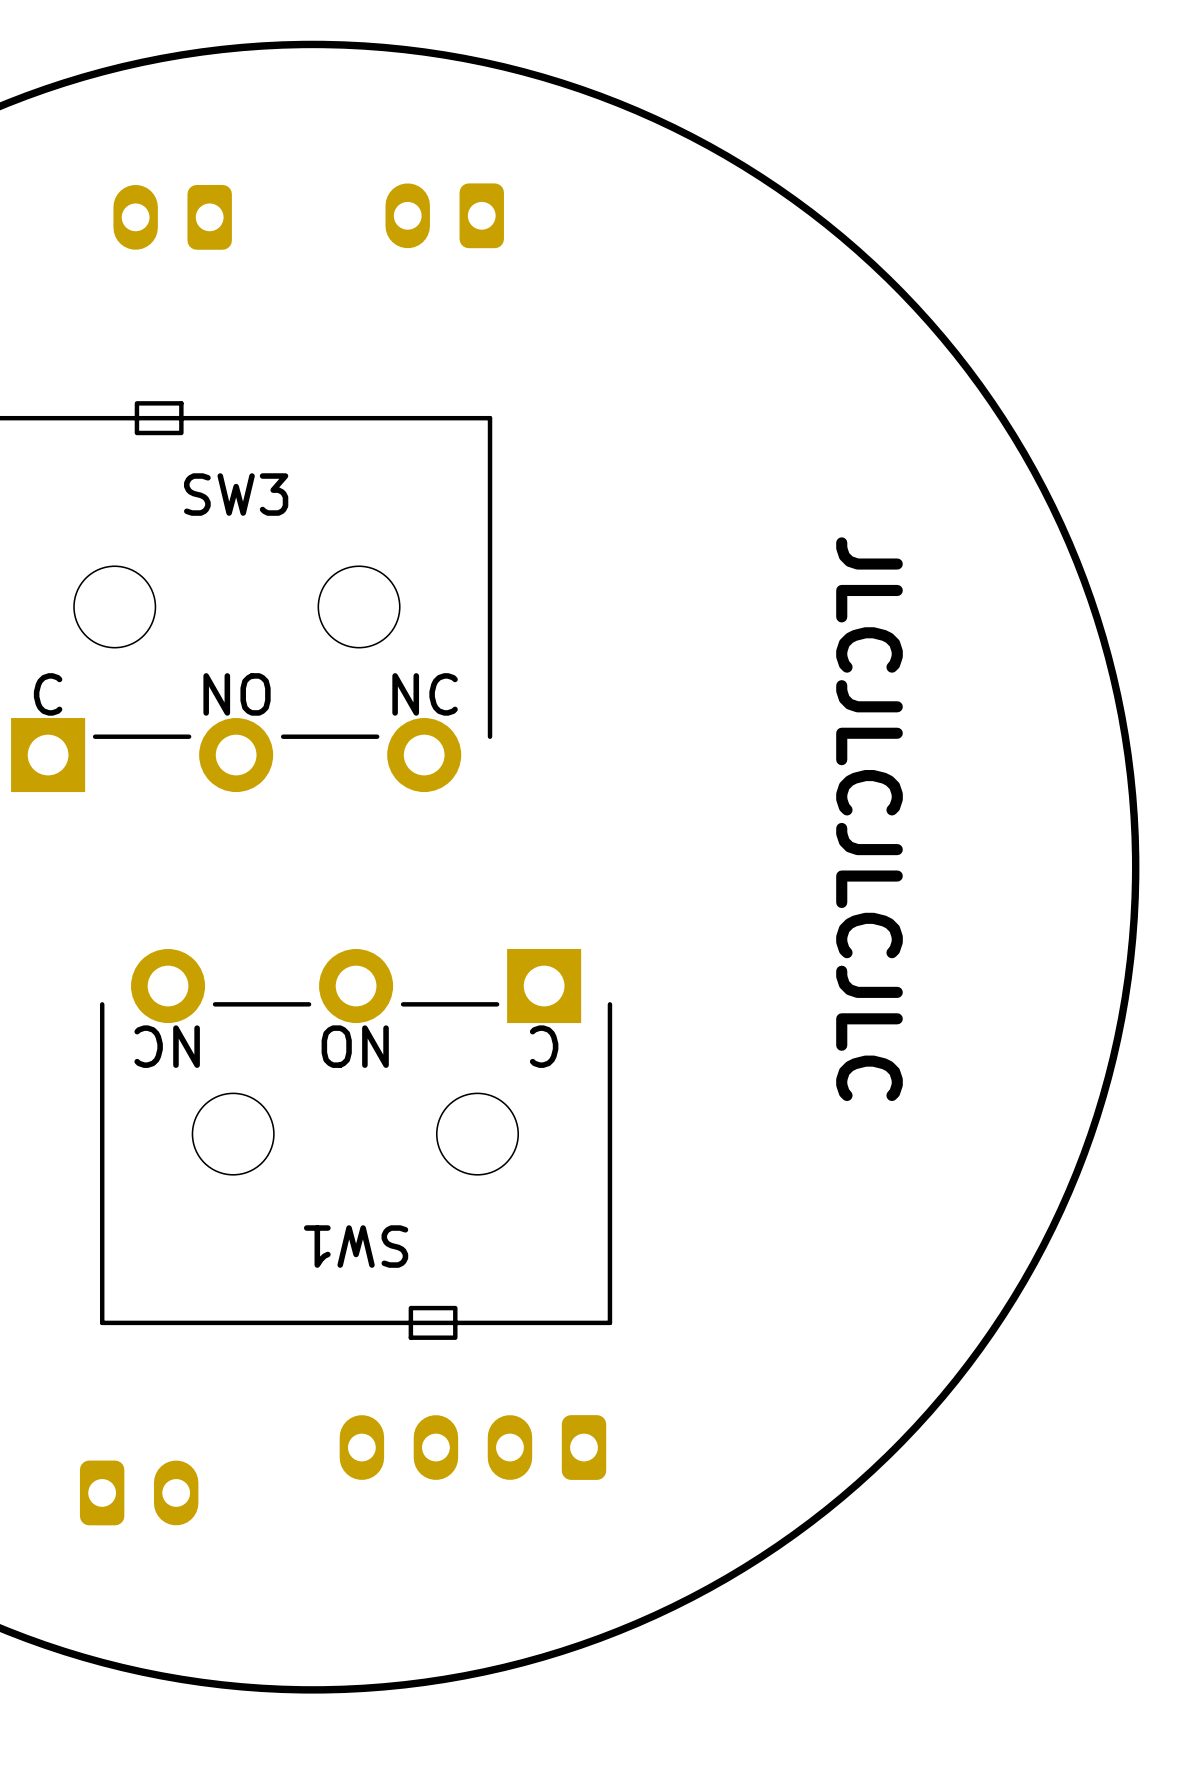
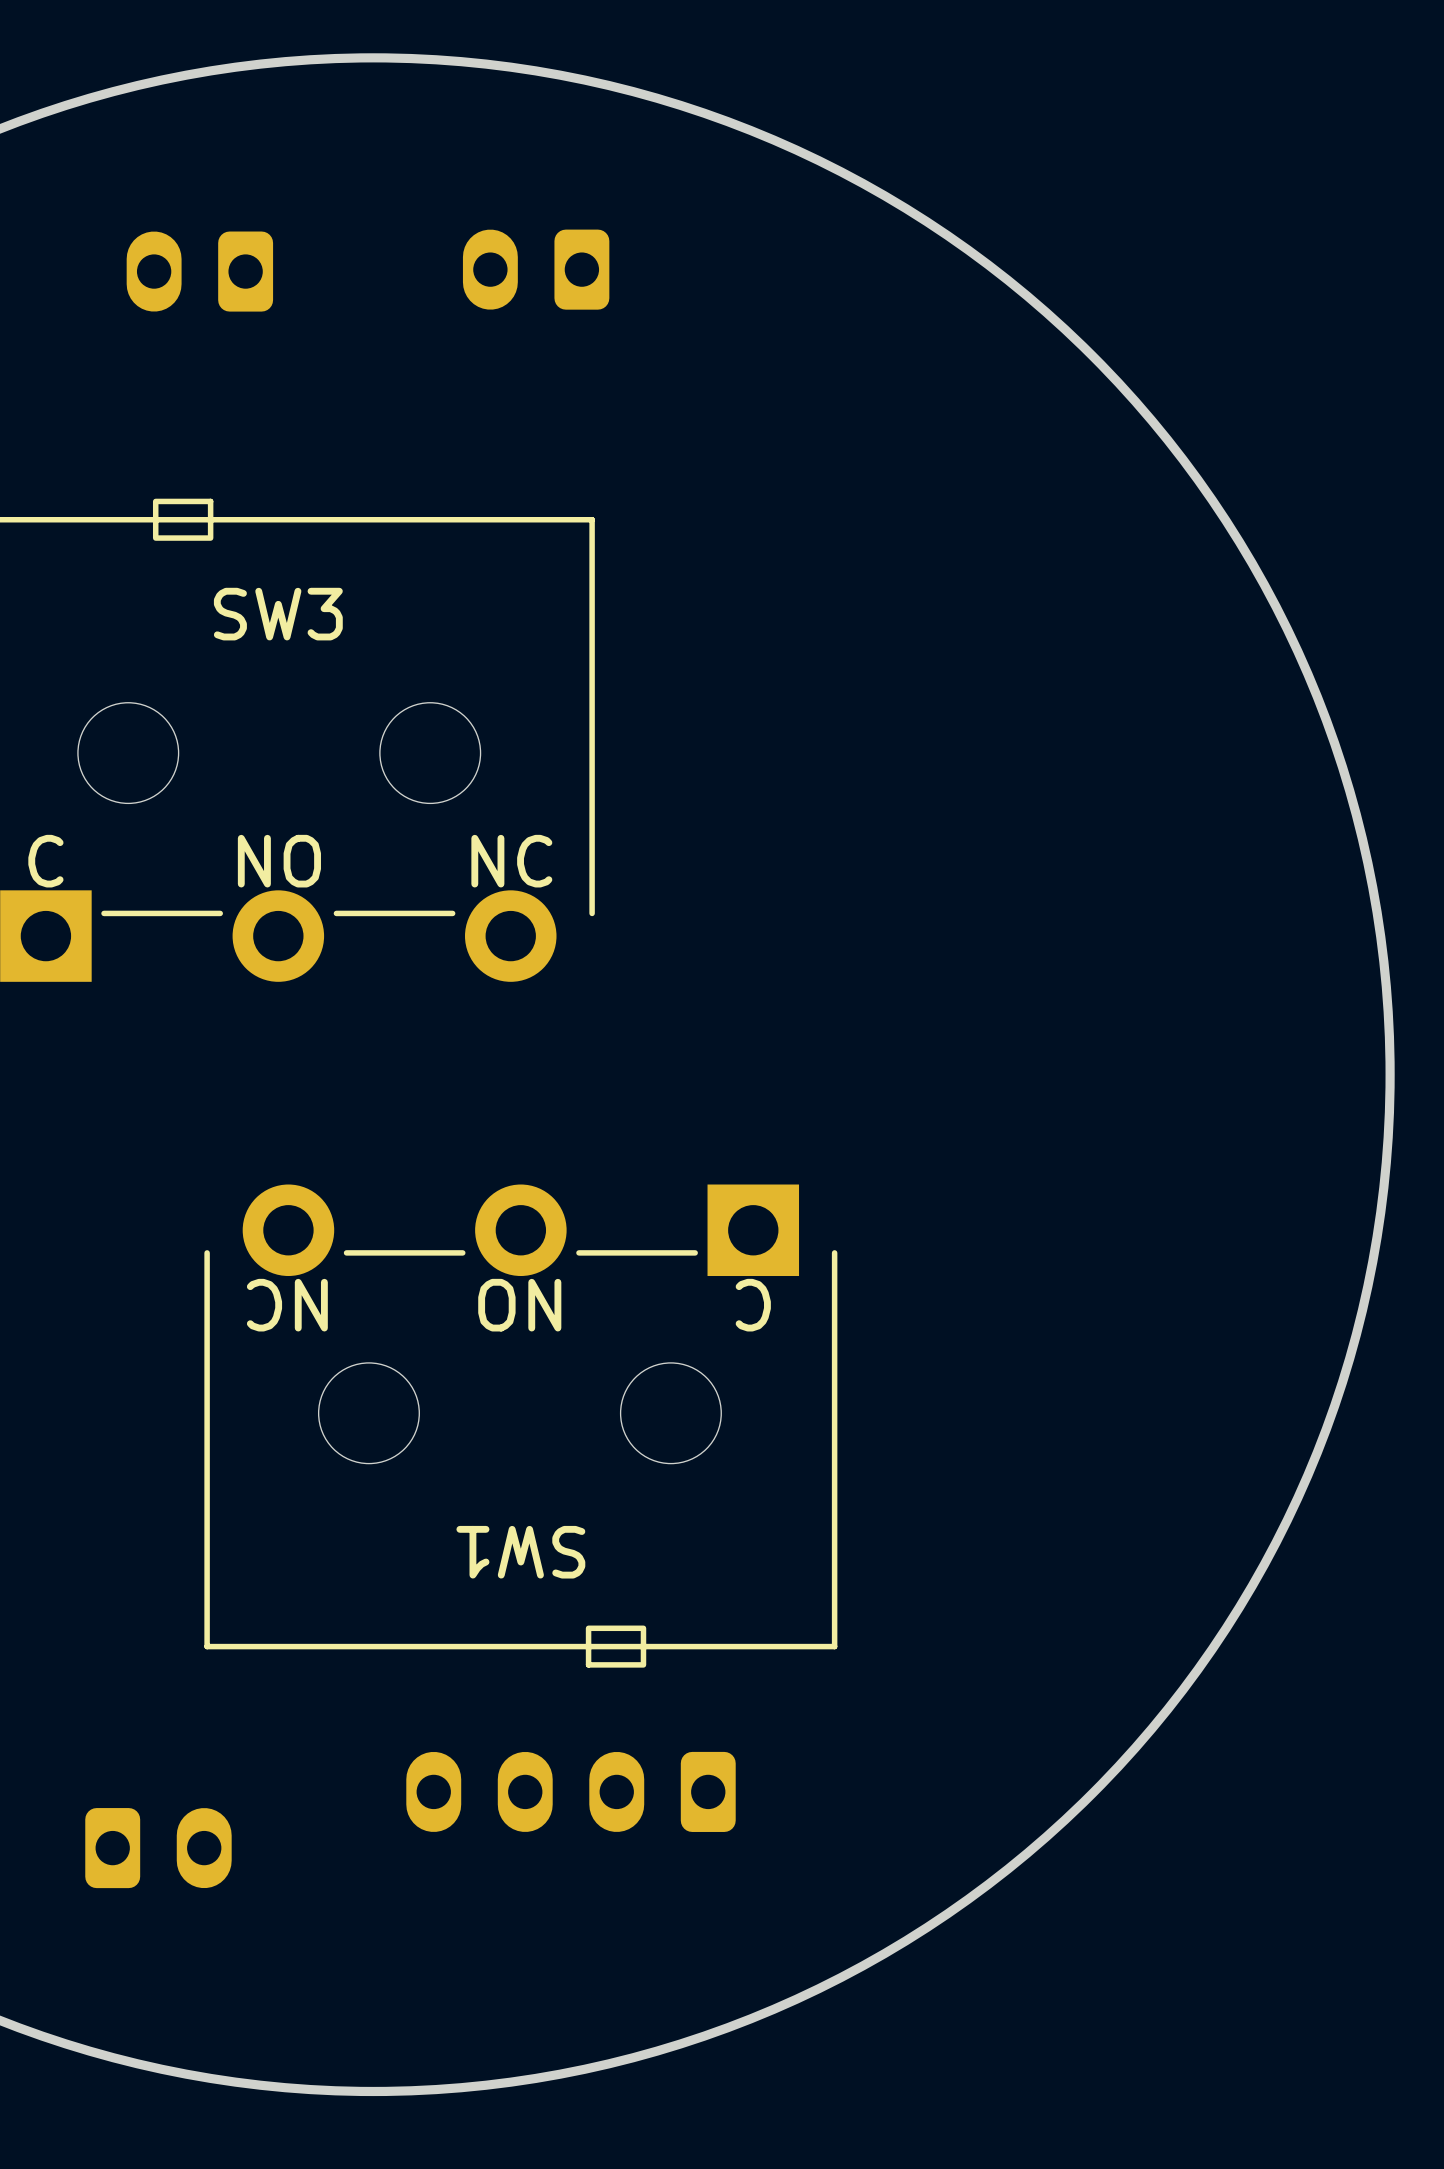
text: JLCJLCJLCJLC (869, 819) -> none
SW1 position: (356, 1144) -> (520, 1426)

